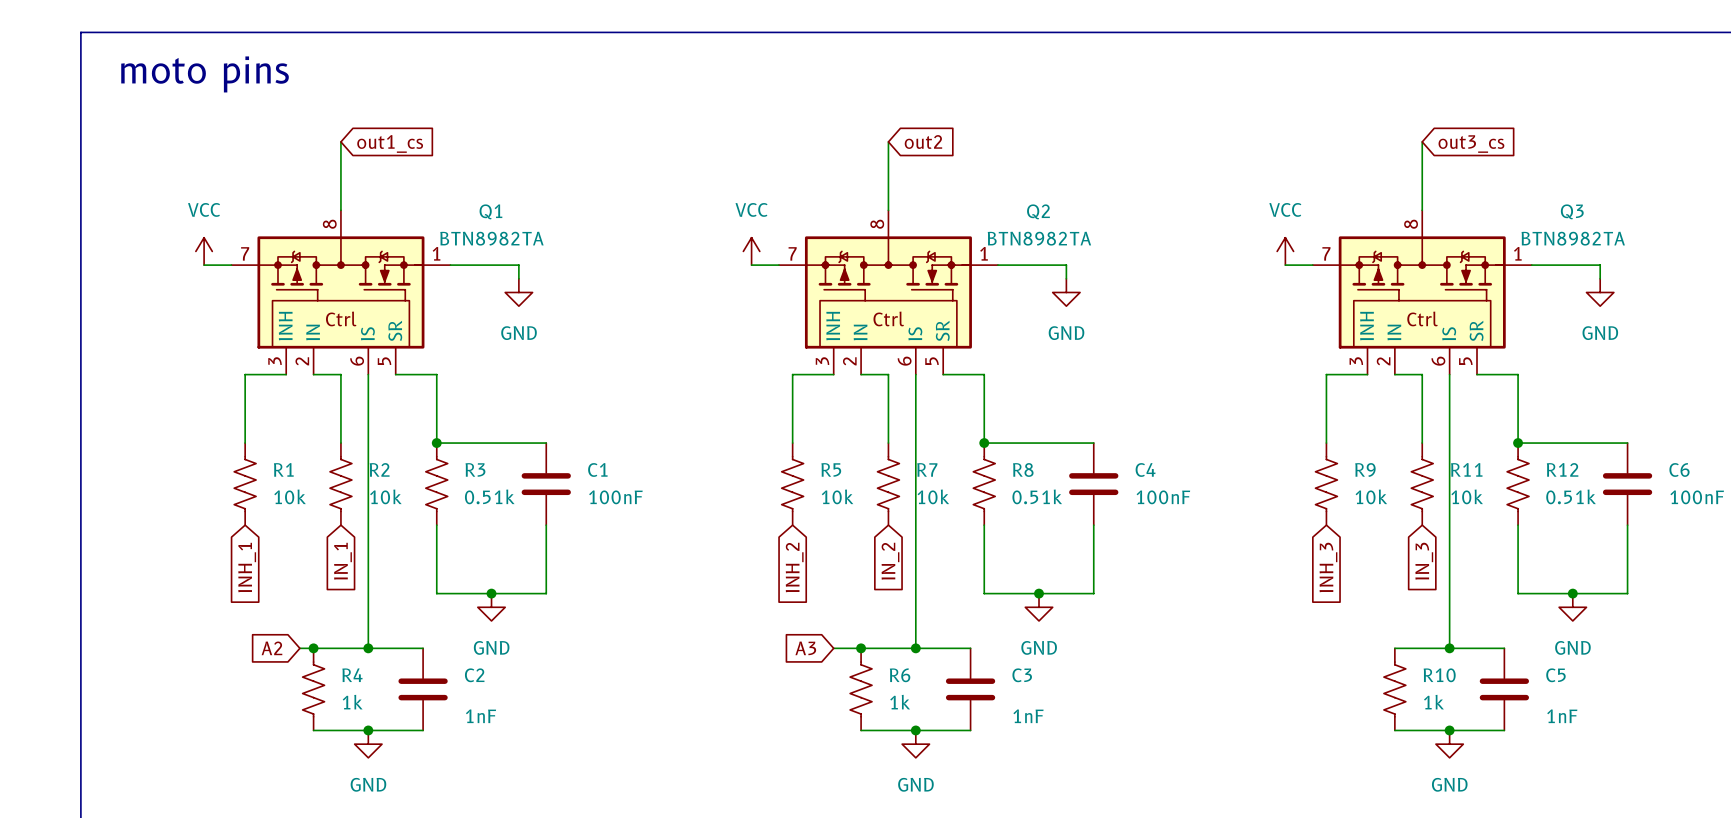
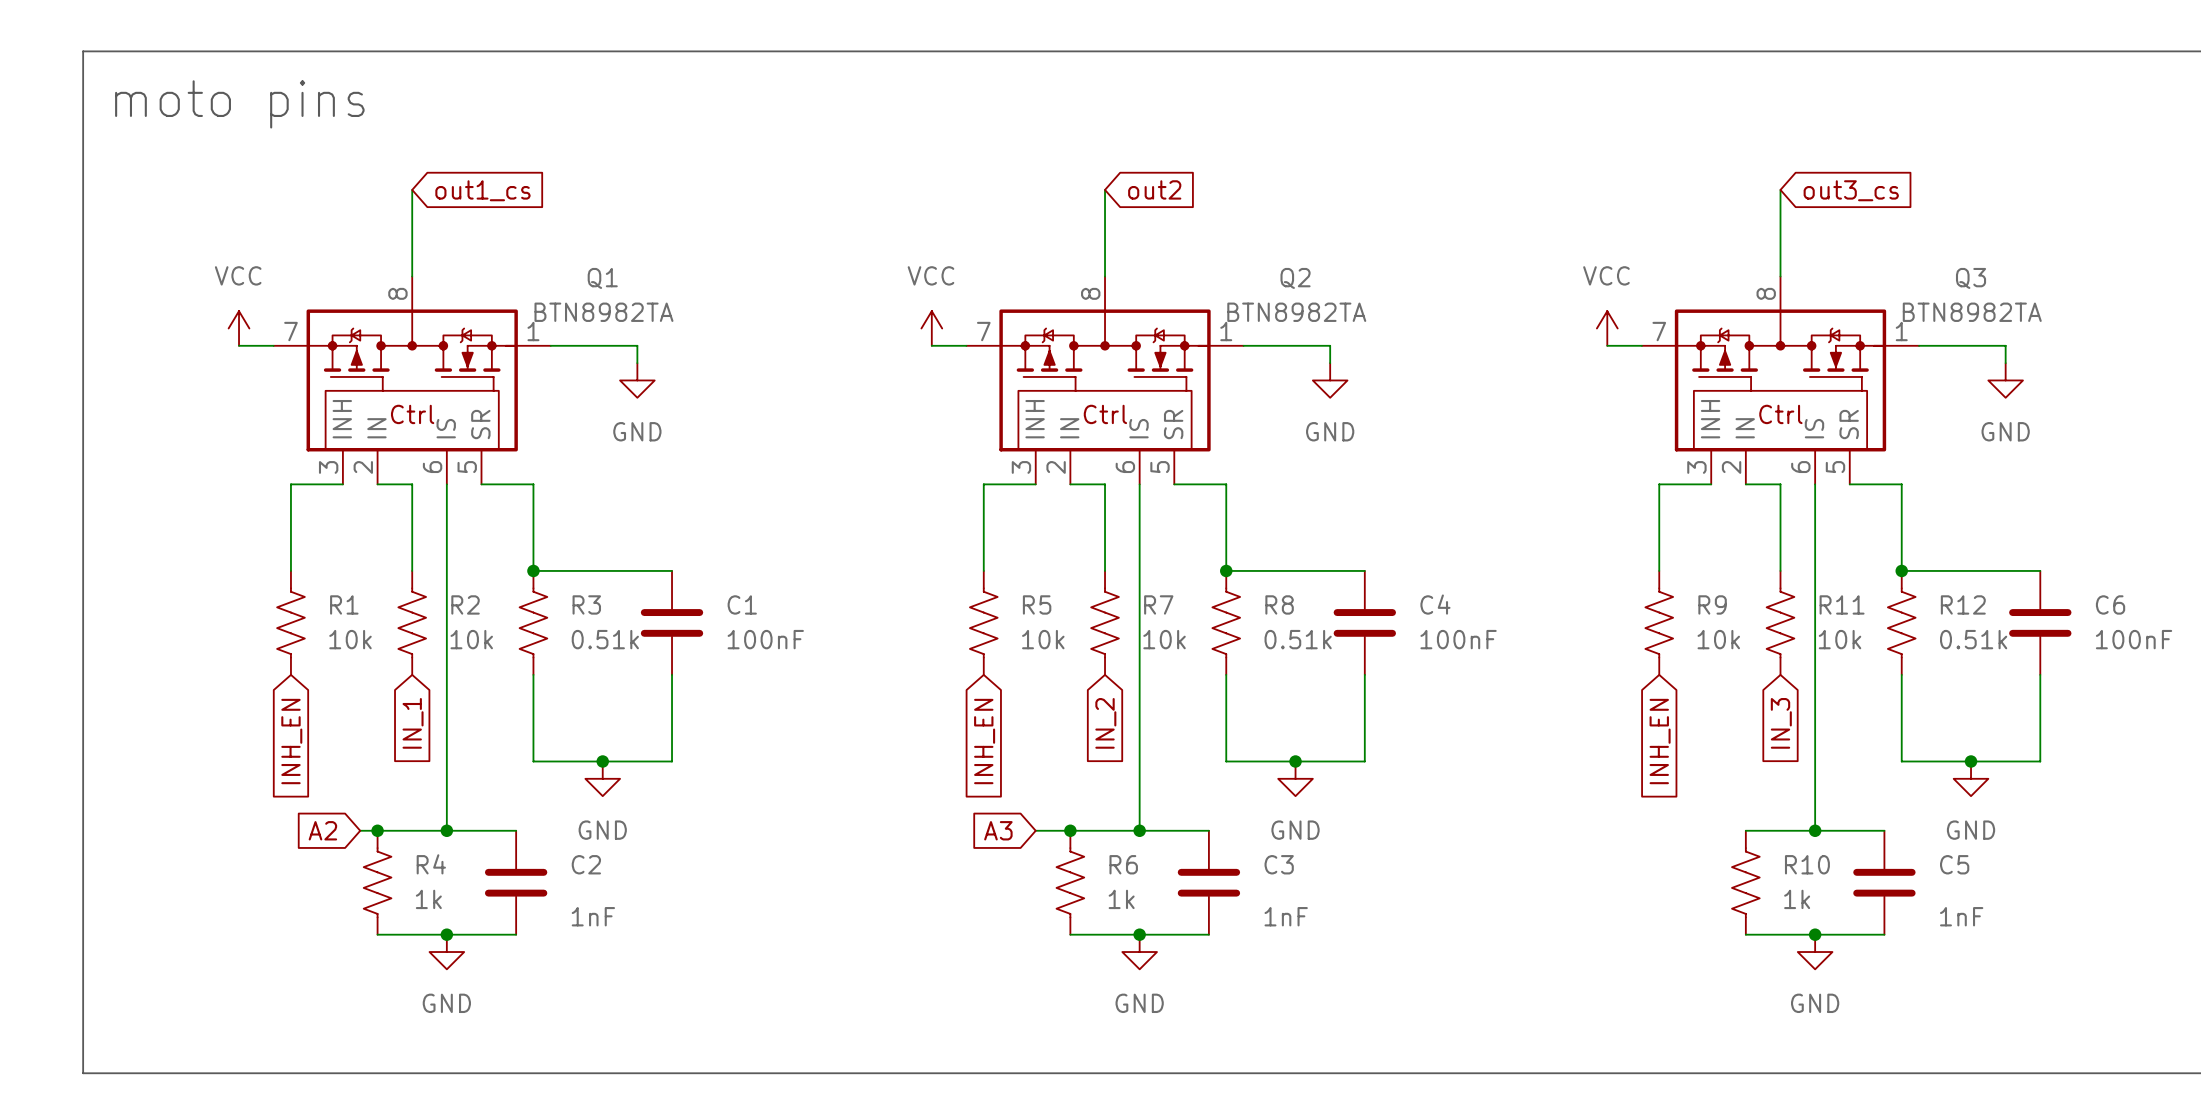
global label: INH_1 (247, 567) -> INH_EN (291, 741)
global label: INH_2 (794, 567) -> INH_EN (984, 741)
global label: INH_3 (1328, 567) -> INH_EN (1660, 741)

